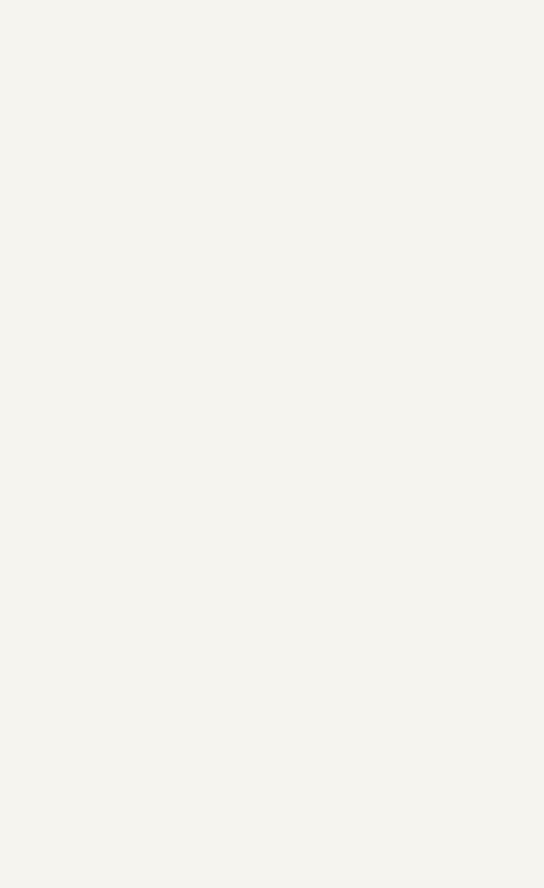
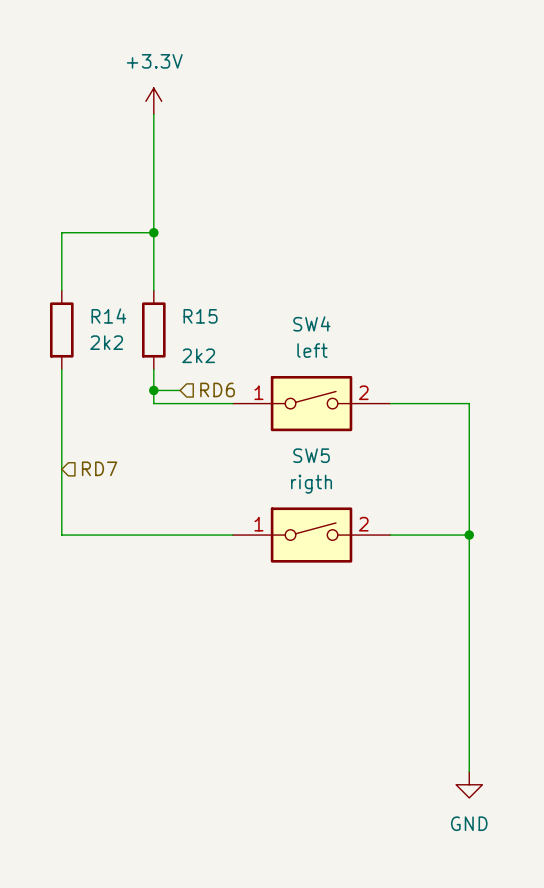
power symbol: none -> +3.3V (153, 101)
wire: none -> (153, 114) (153, 290)
wire: none -> (153, 232) (61, 232) (61, 290)
junction: none -> (153, 232)
R14: none -> 2k2 (61, 329)
R15: none -> 2k2 (153, 329)
wire: none -> (61, 369) (61, 535) (232, 535)
wire: none -> (153, 369) (153, 403) (232, 403)
hierarchical label: none -> RD6 (217, 389)
wire: none -> (153, 390) (180, 390)
junction: none -> (153, 390)
SW4: none -> left (311, 403)
wire: none -> (390, 403) (469, 403) (469, 771)
hierarchical label: none -> RD7 (99, 468)
SW5: none -> rigth (311, 535)
wire: none -> (390, 535) (469, 535)
junction: none -> (469, 535)
power symbol: none -> GND (469, 784)

